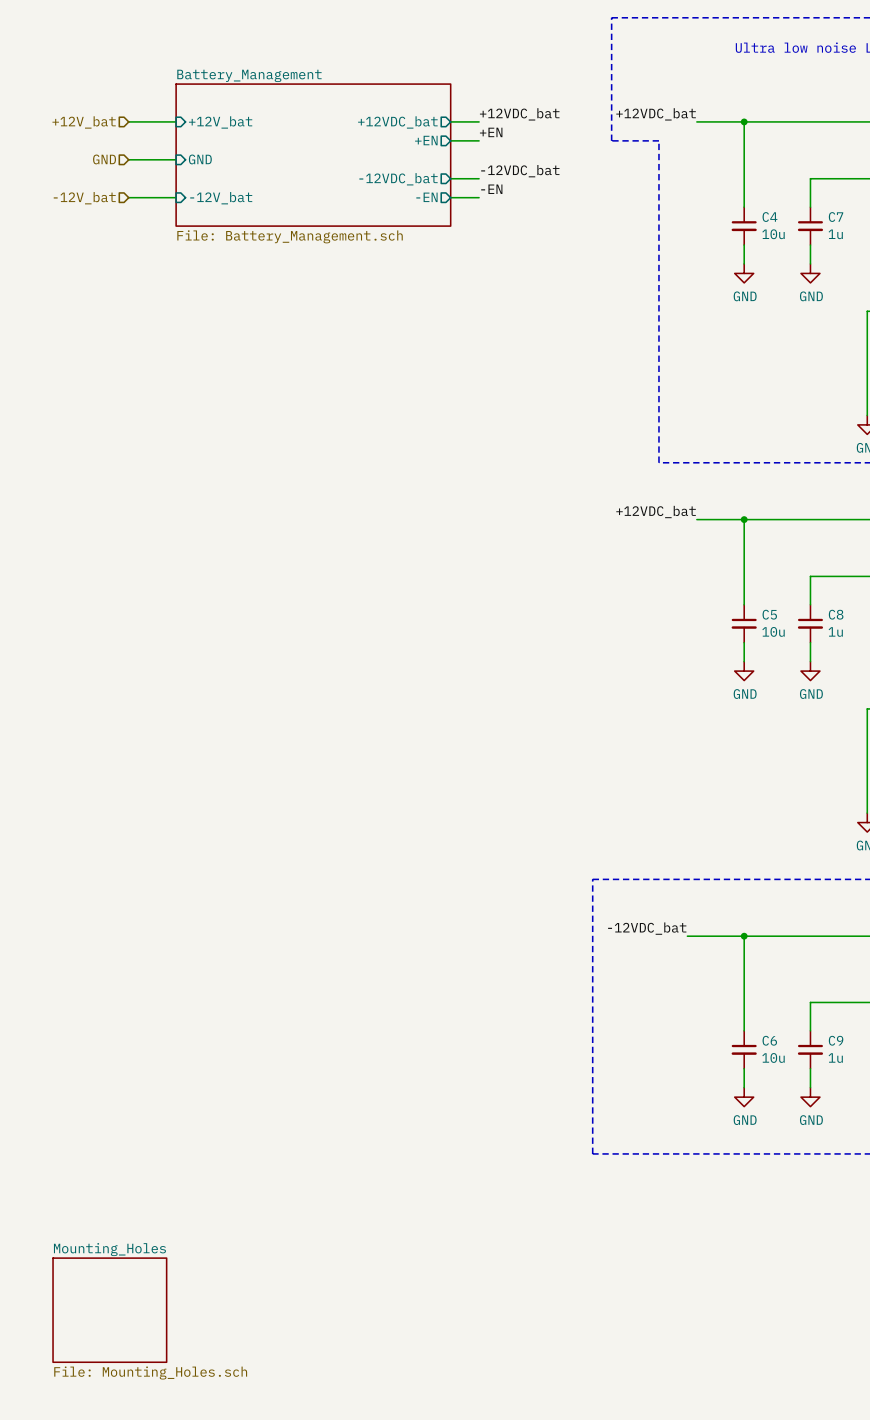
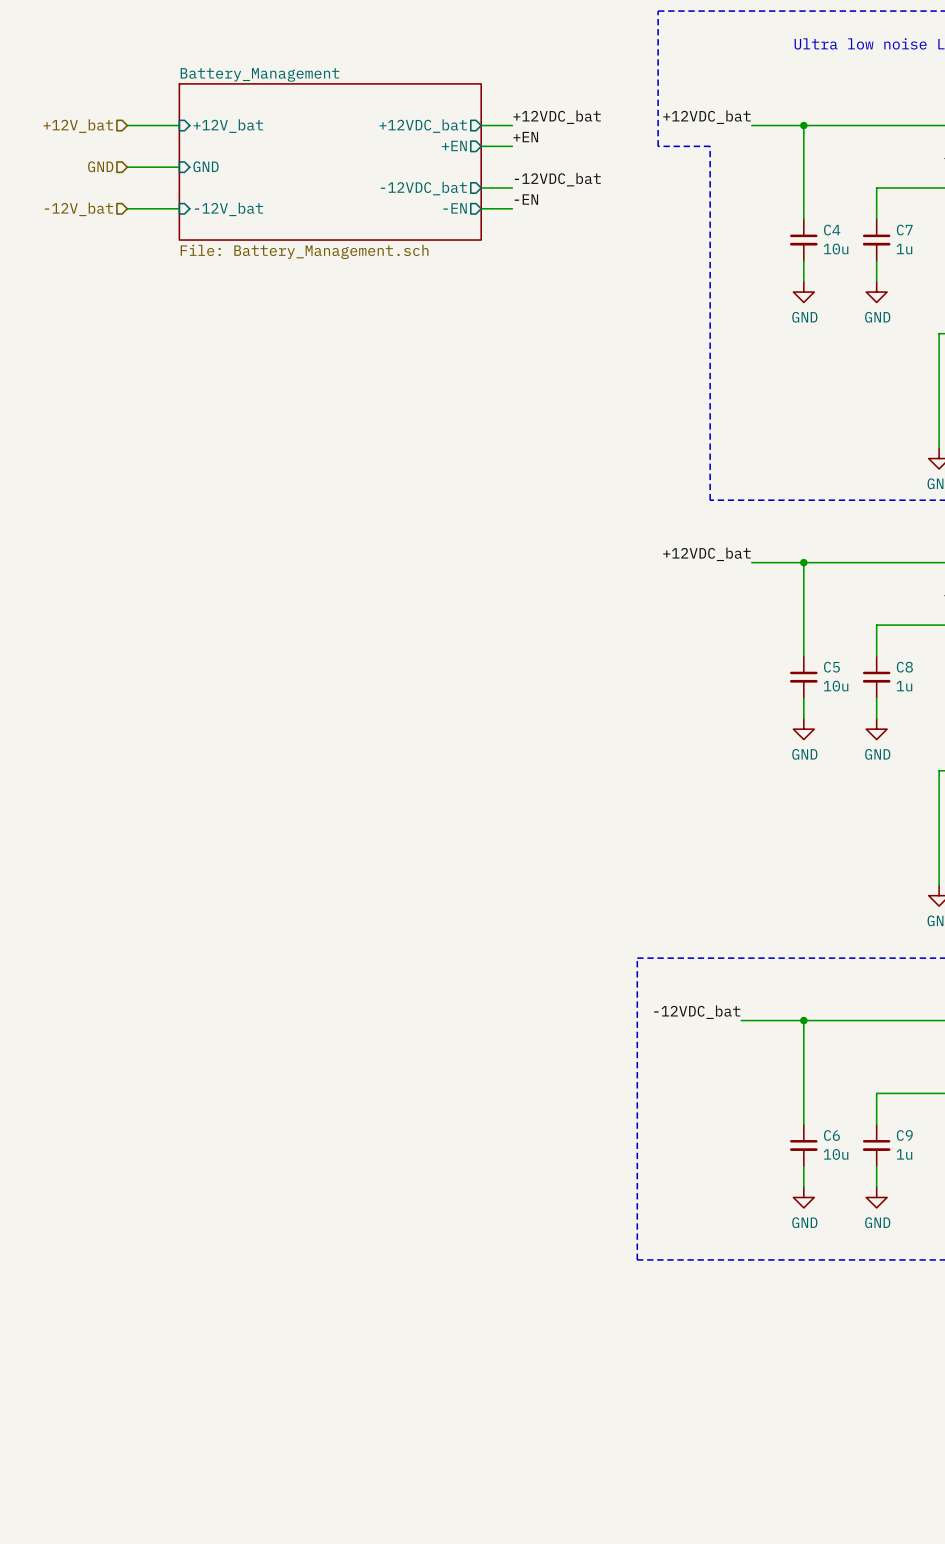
sheet Mounting_Holes: File: Mounting_Holes.sch (109, 1310) -> none

